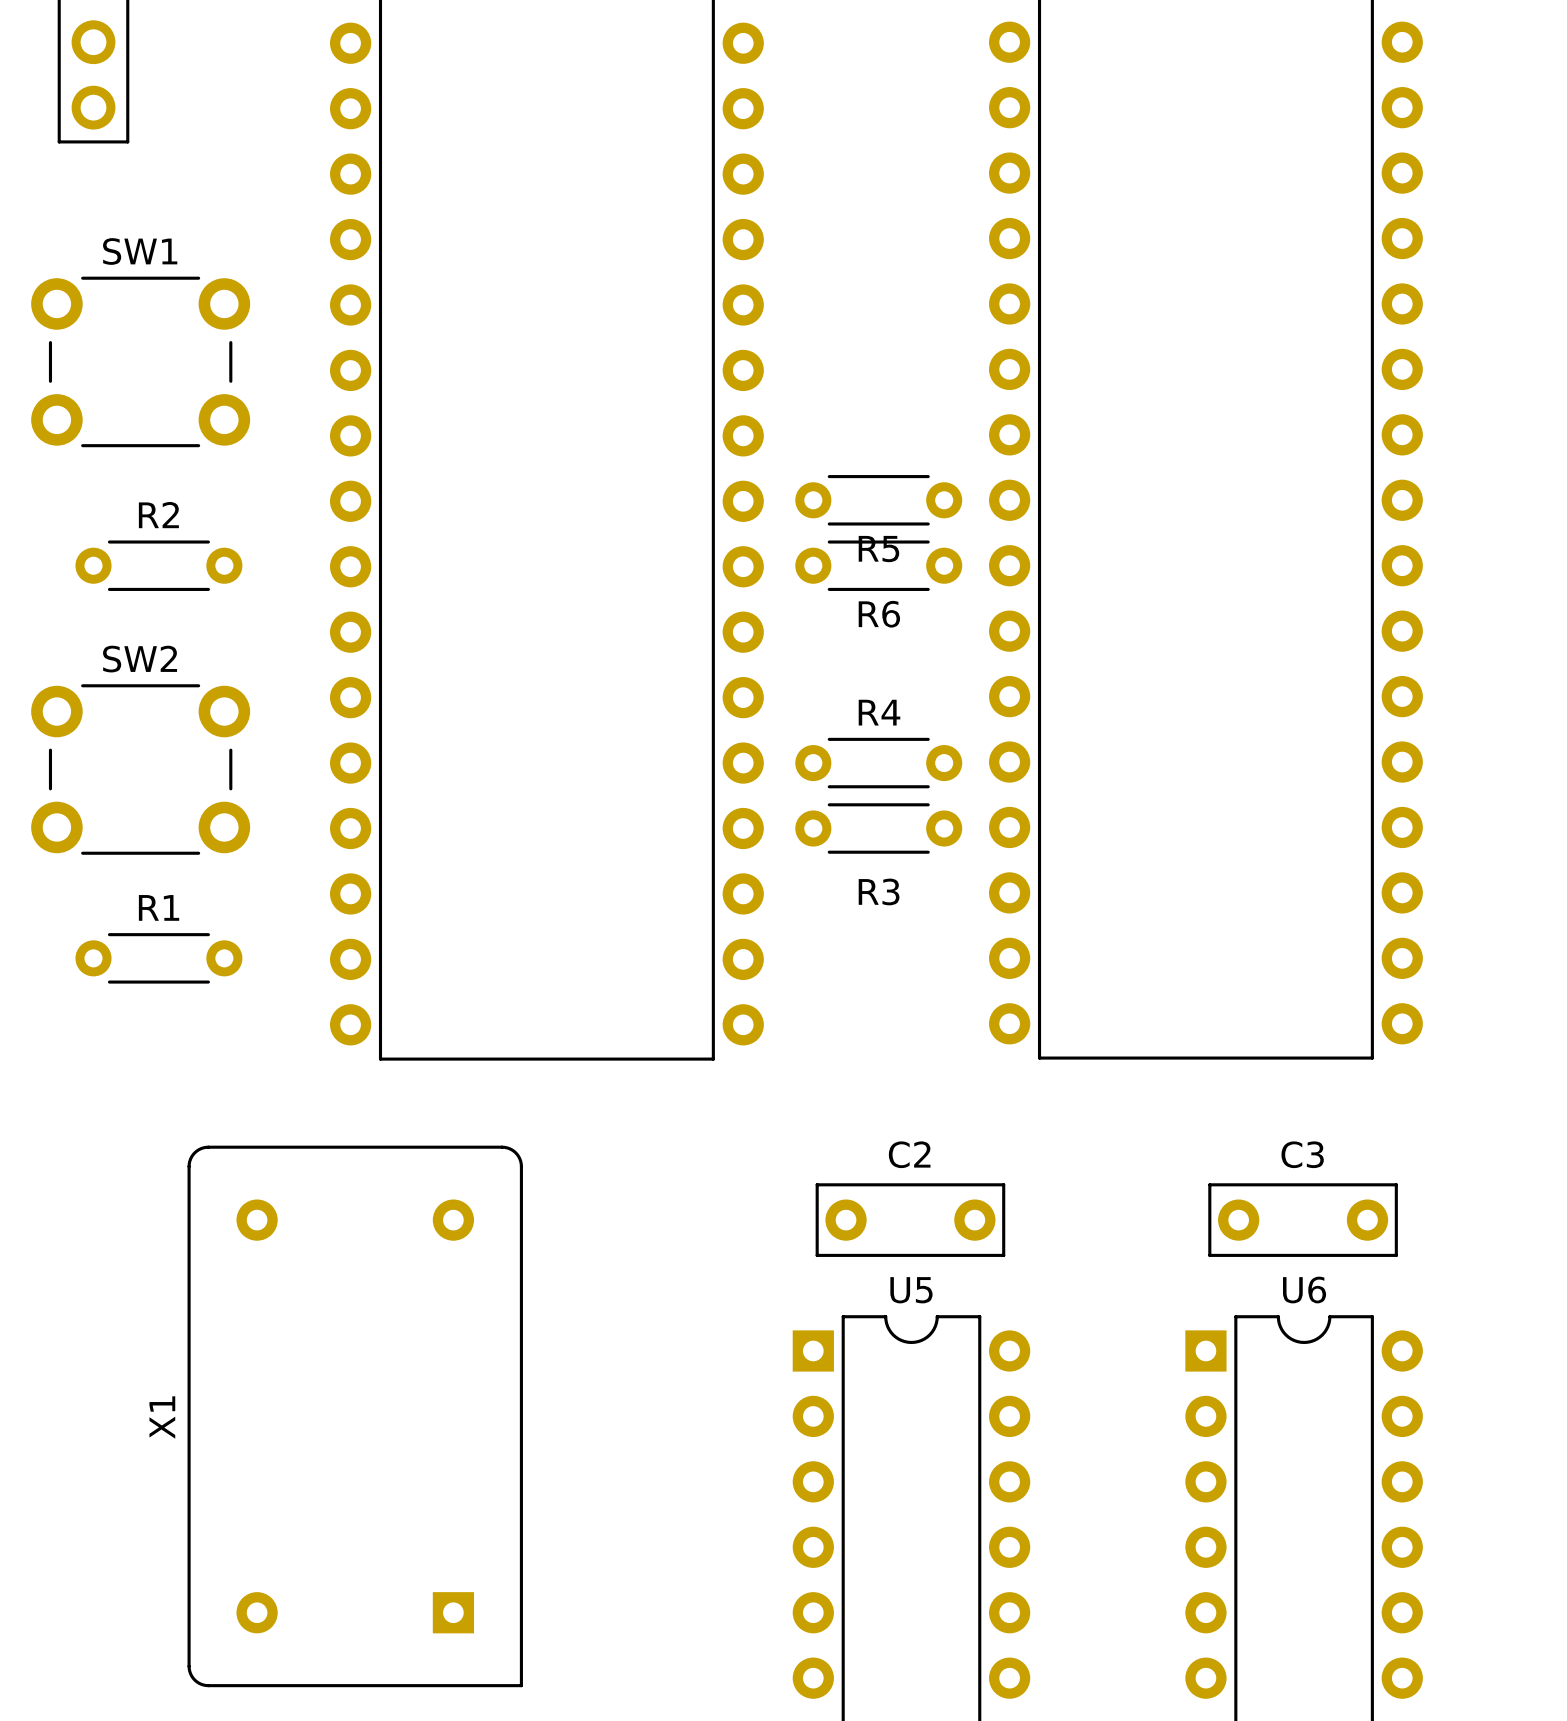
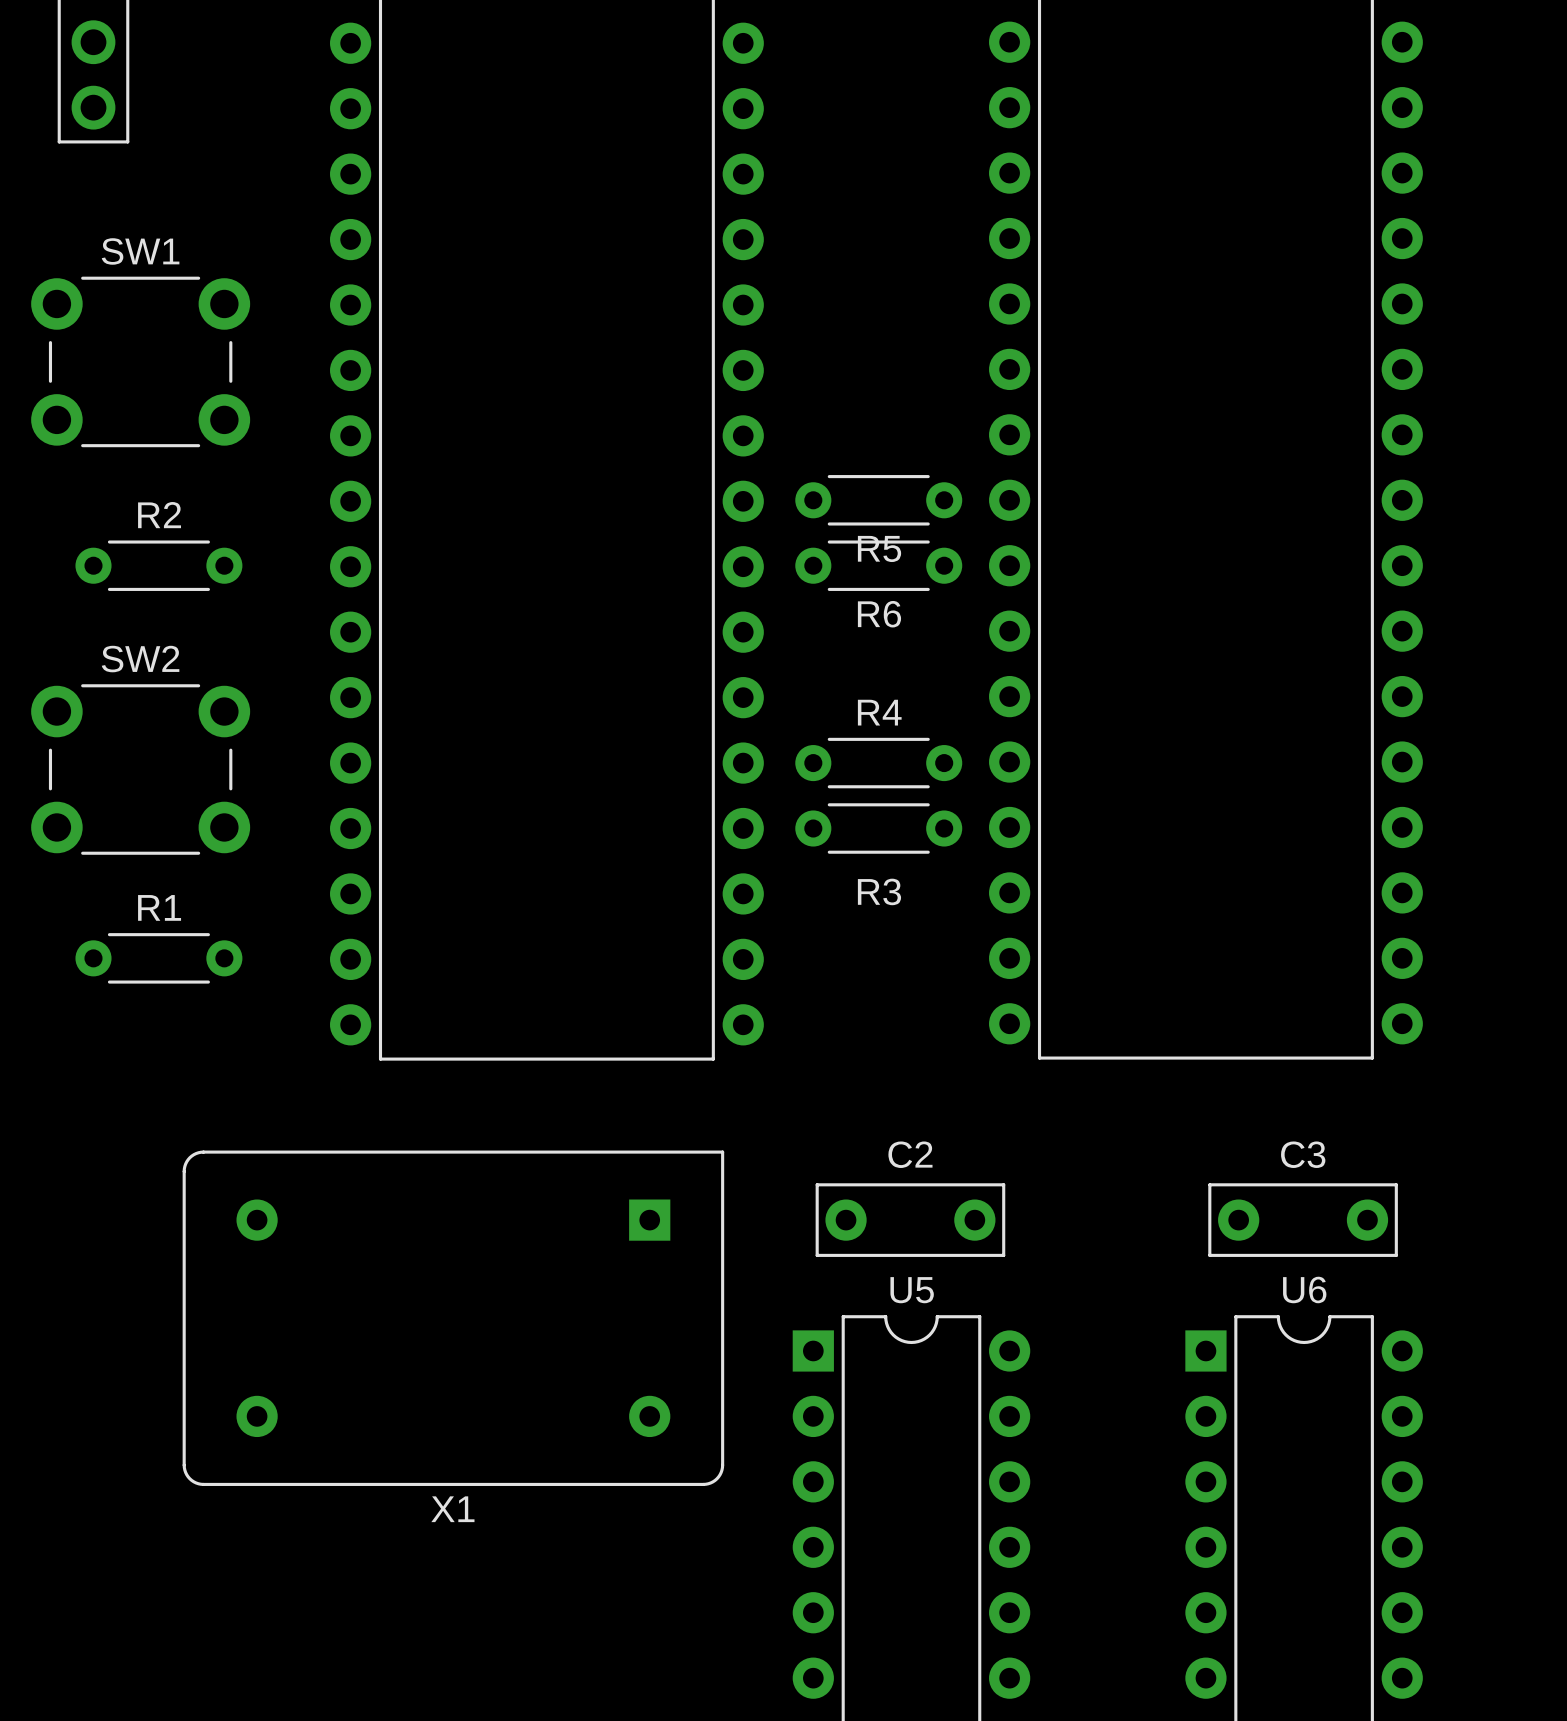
X1 rotation: 0° (355, 1416) -> 90° counterclockwise (453, 1318)

